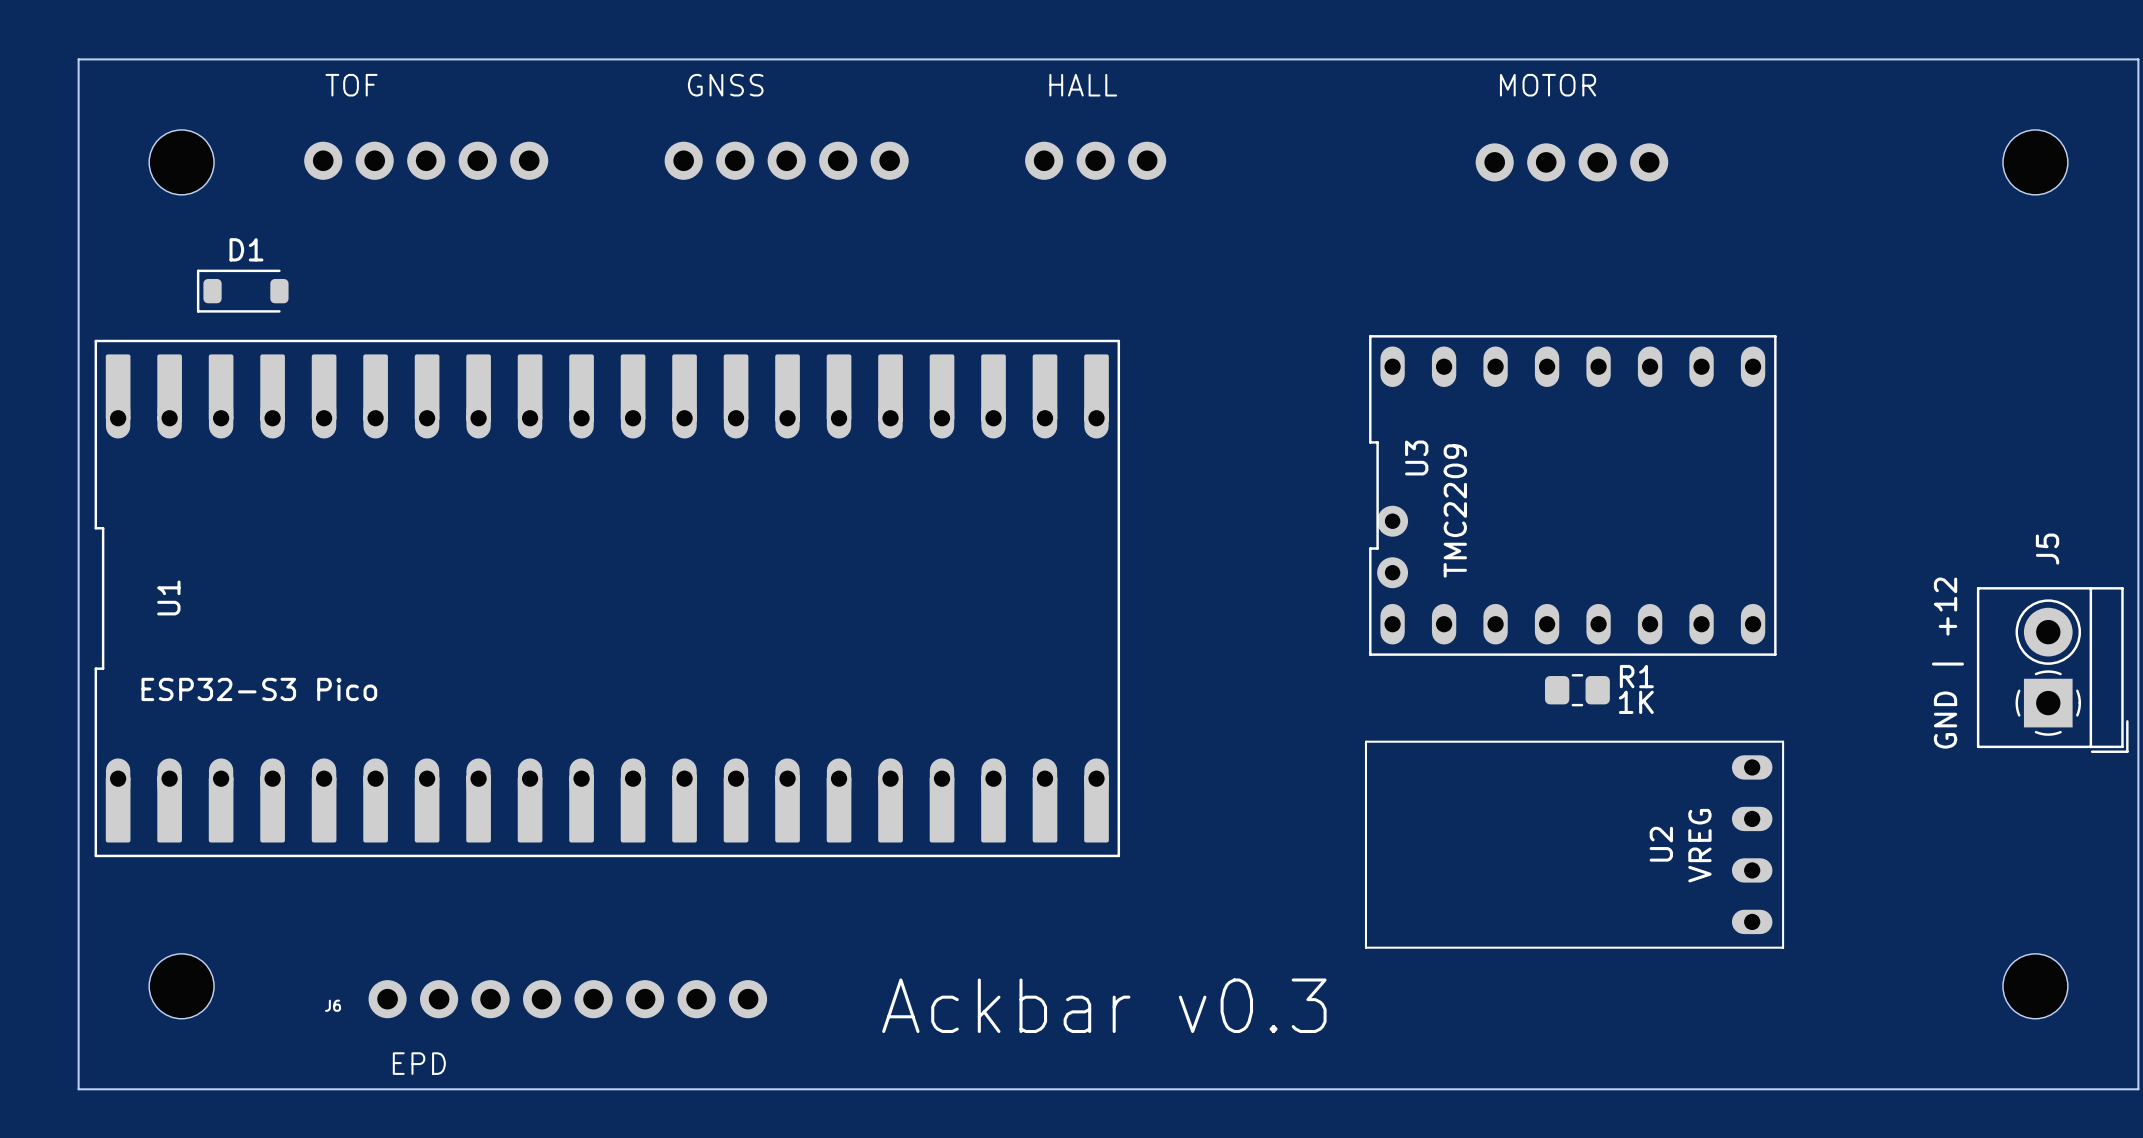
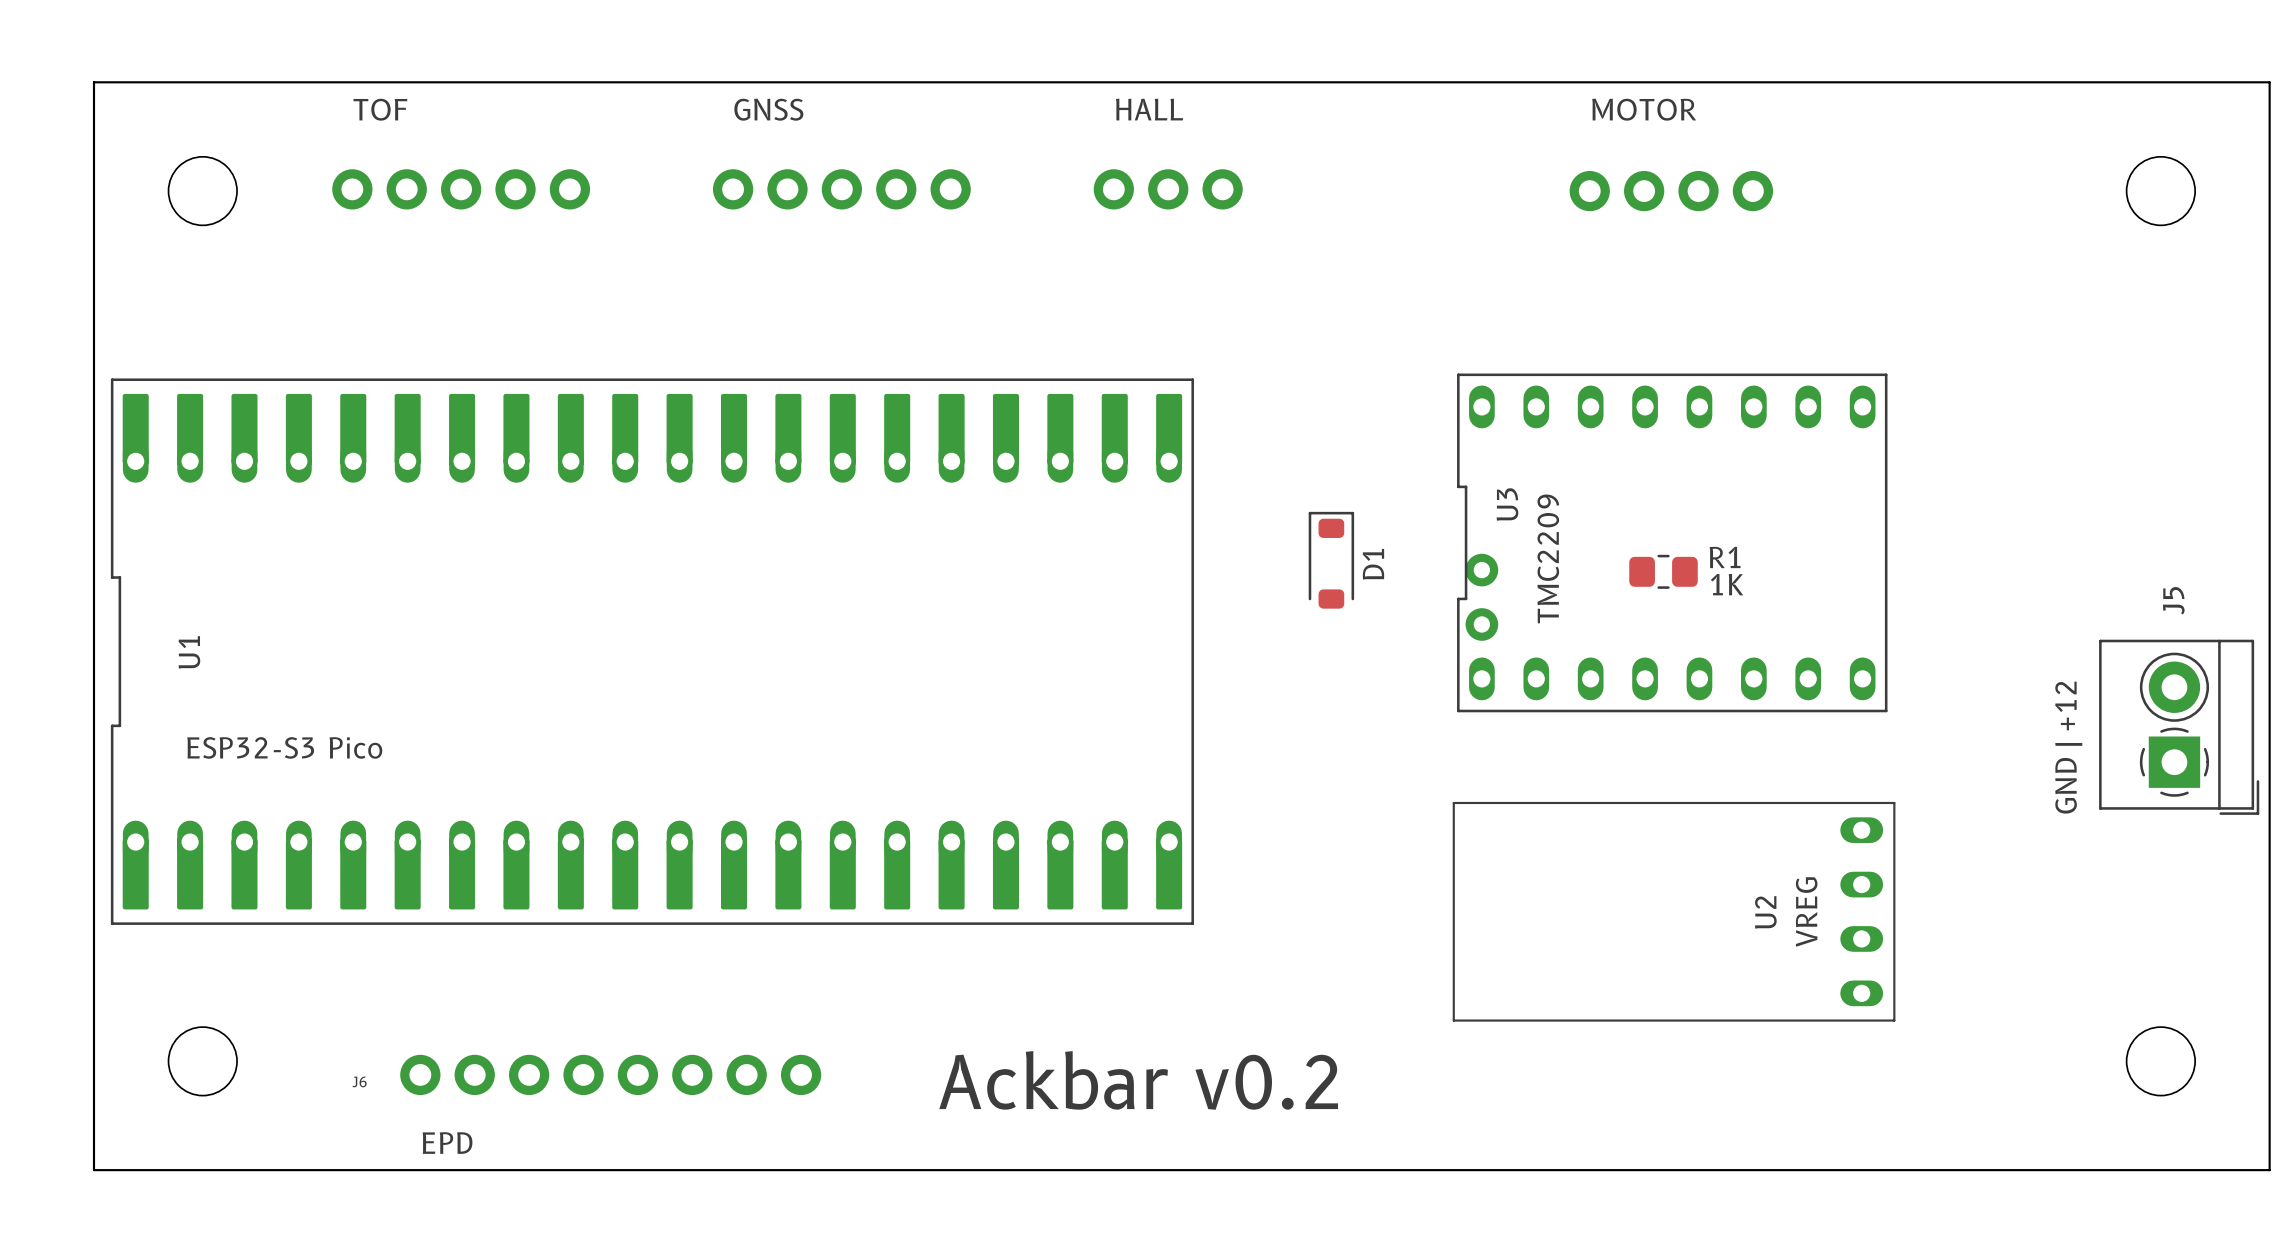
D1 rotation: 0° (242, 291) -> 90° clockwise (1331, 560)
D1 position: (242, 291) -> (1331, 560)
R1 position: (1577, 690) -> (1663, 571)
text: Ackbar v0.3 (1104, 1005) -> Ackbar v0.2 (1138, 1080)

